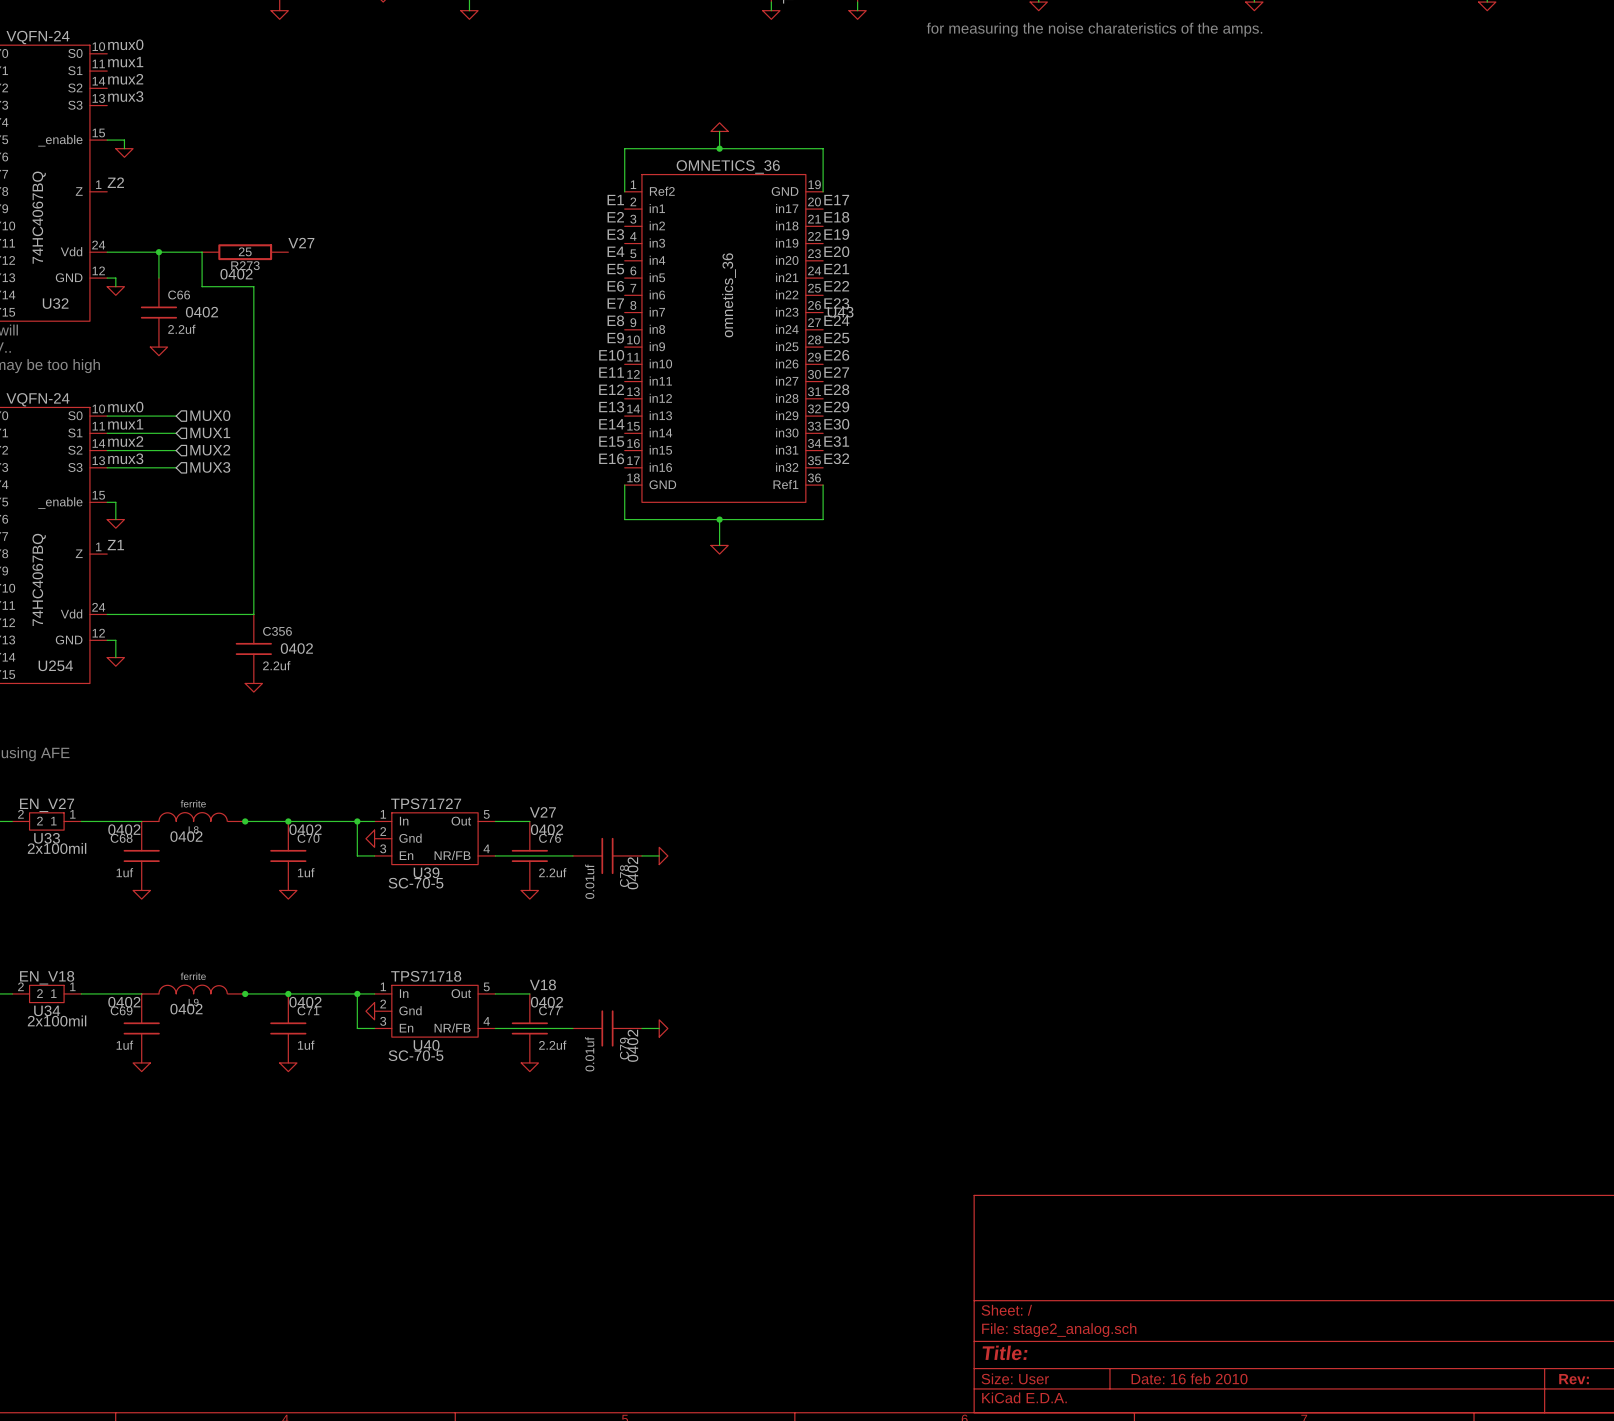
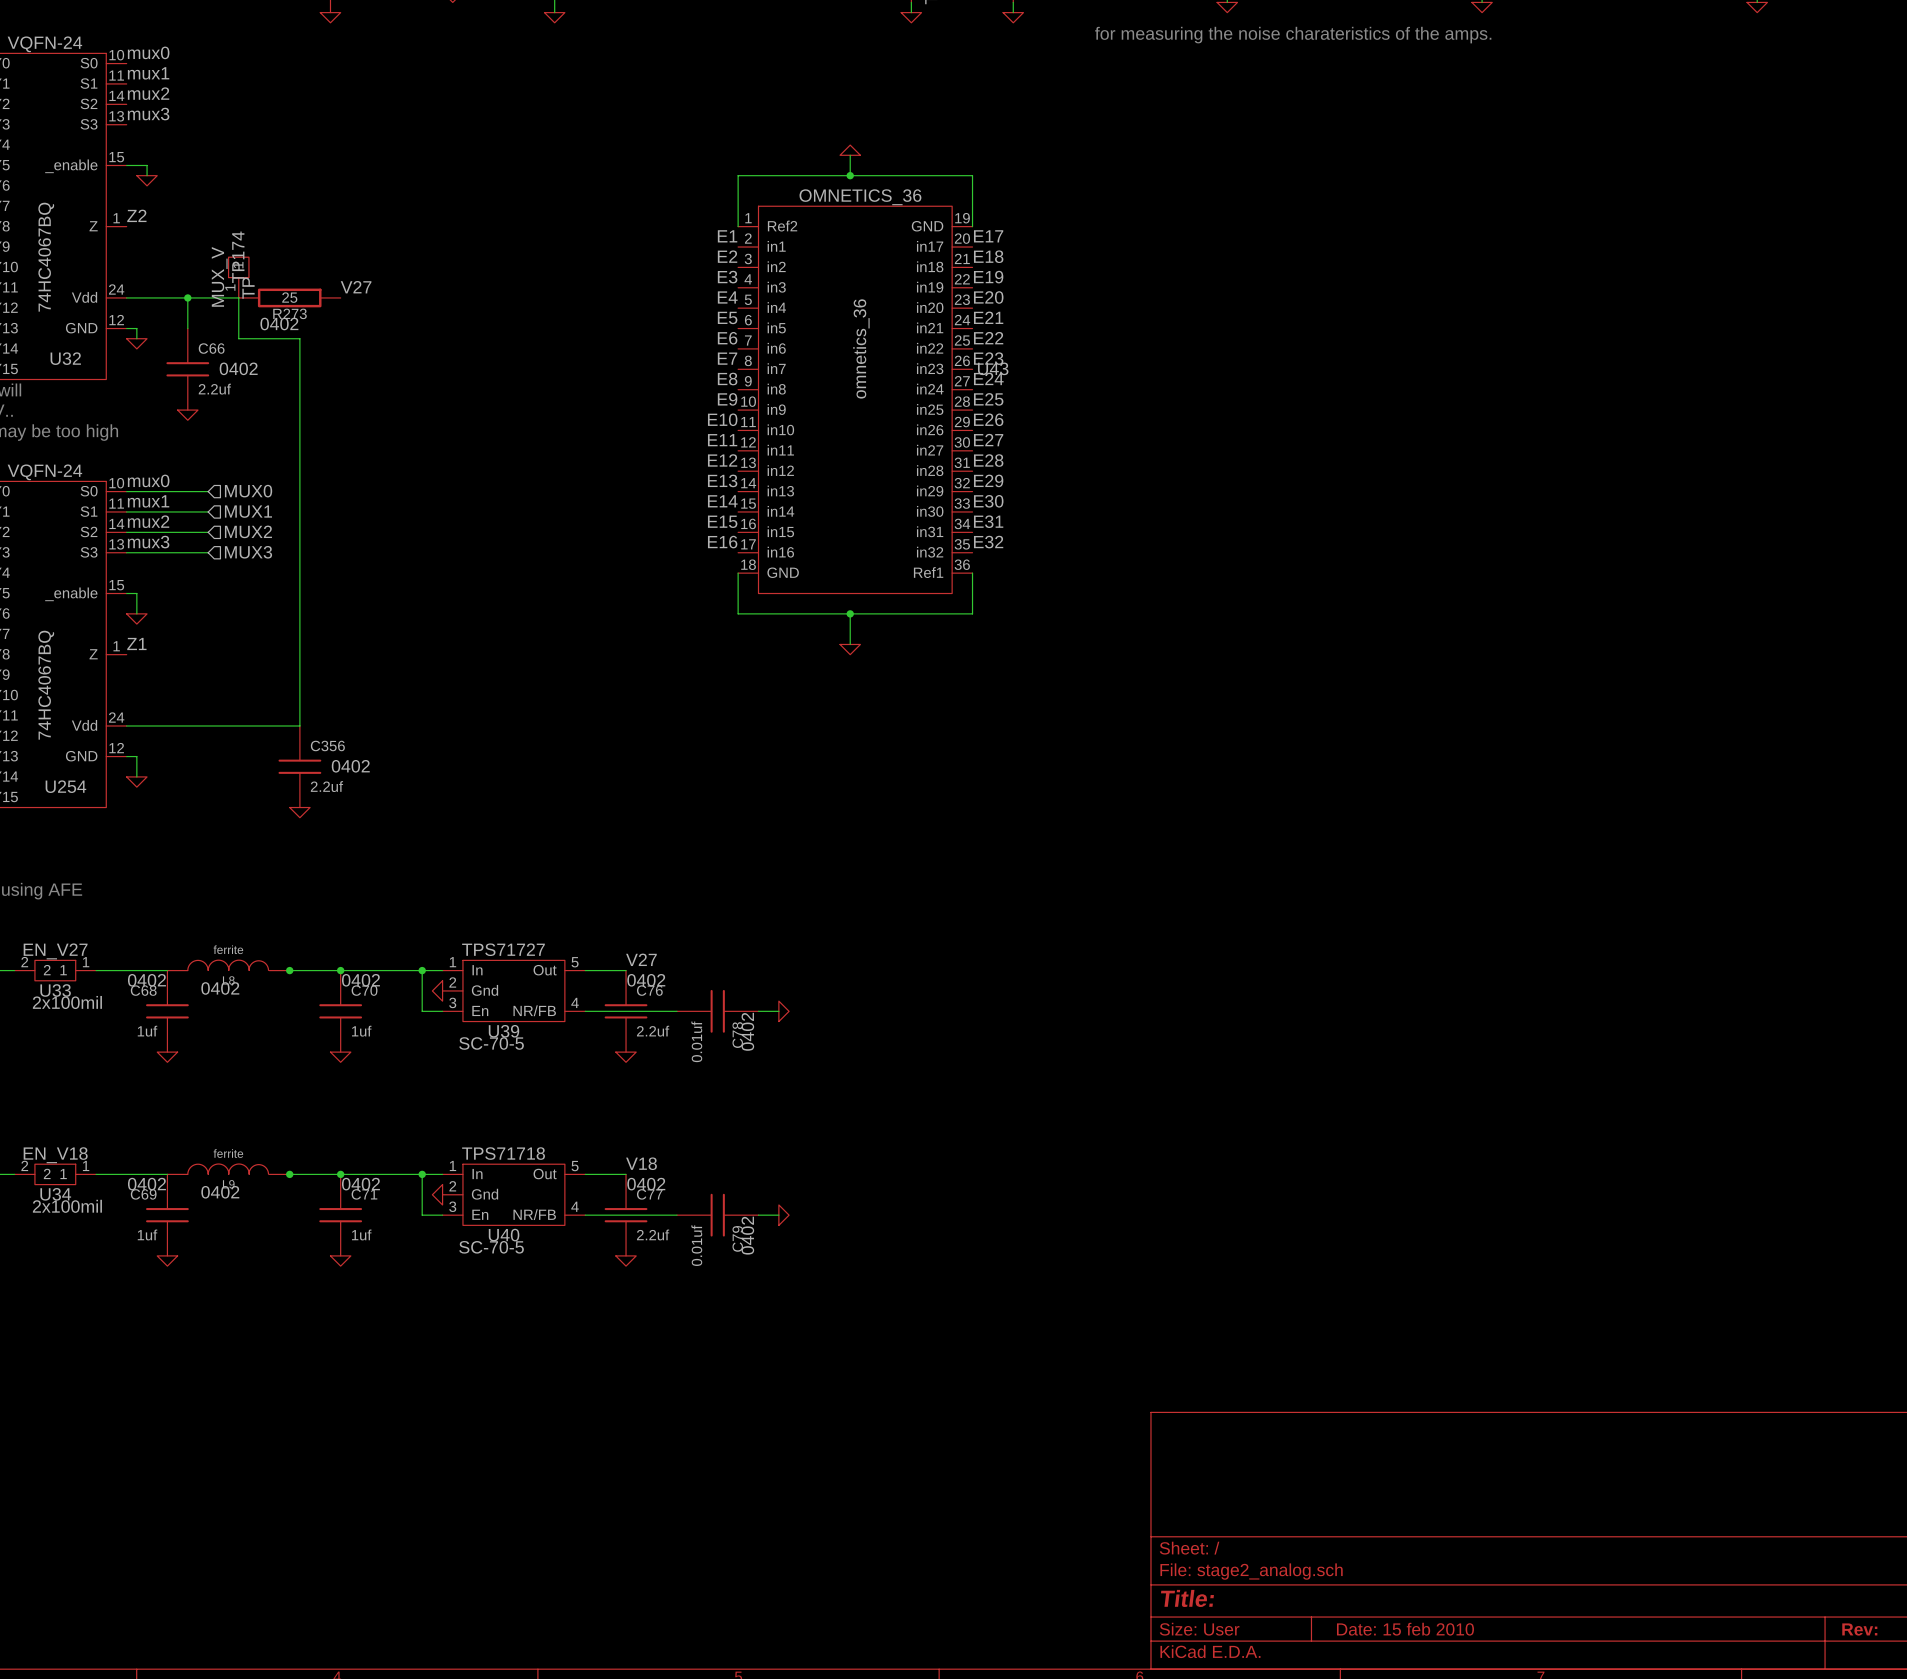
TP174: none -> MUX_V (238, 277)
title block: Date: 16 feb 2010 (1189, 1378) -> Date: 15 feb 2010 (1405, 1629)

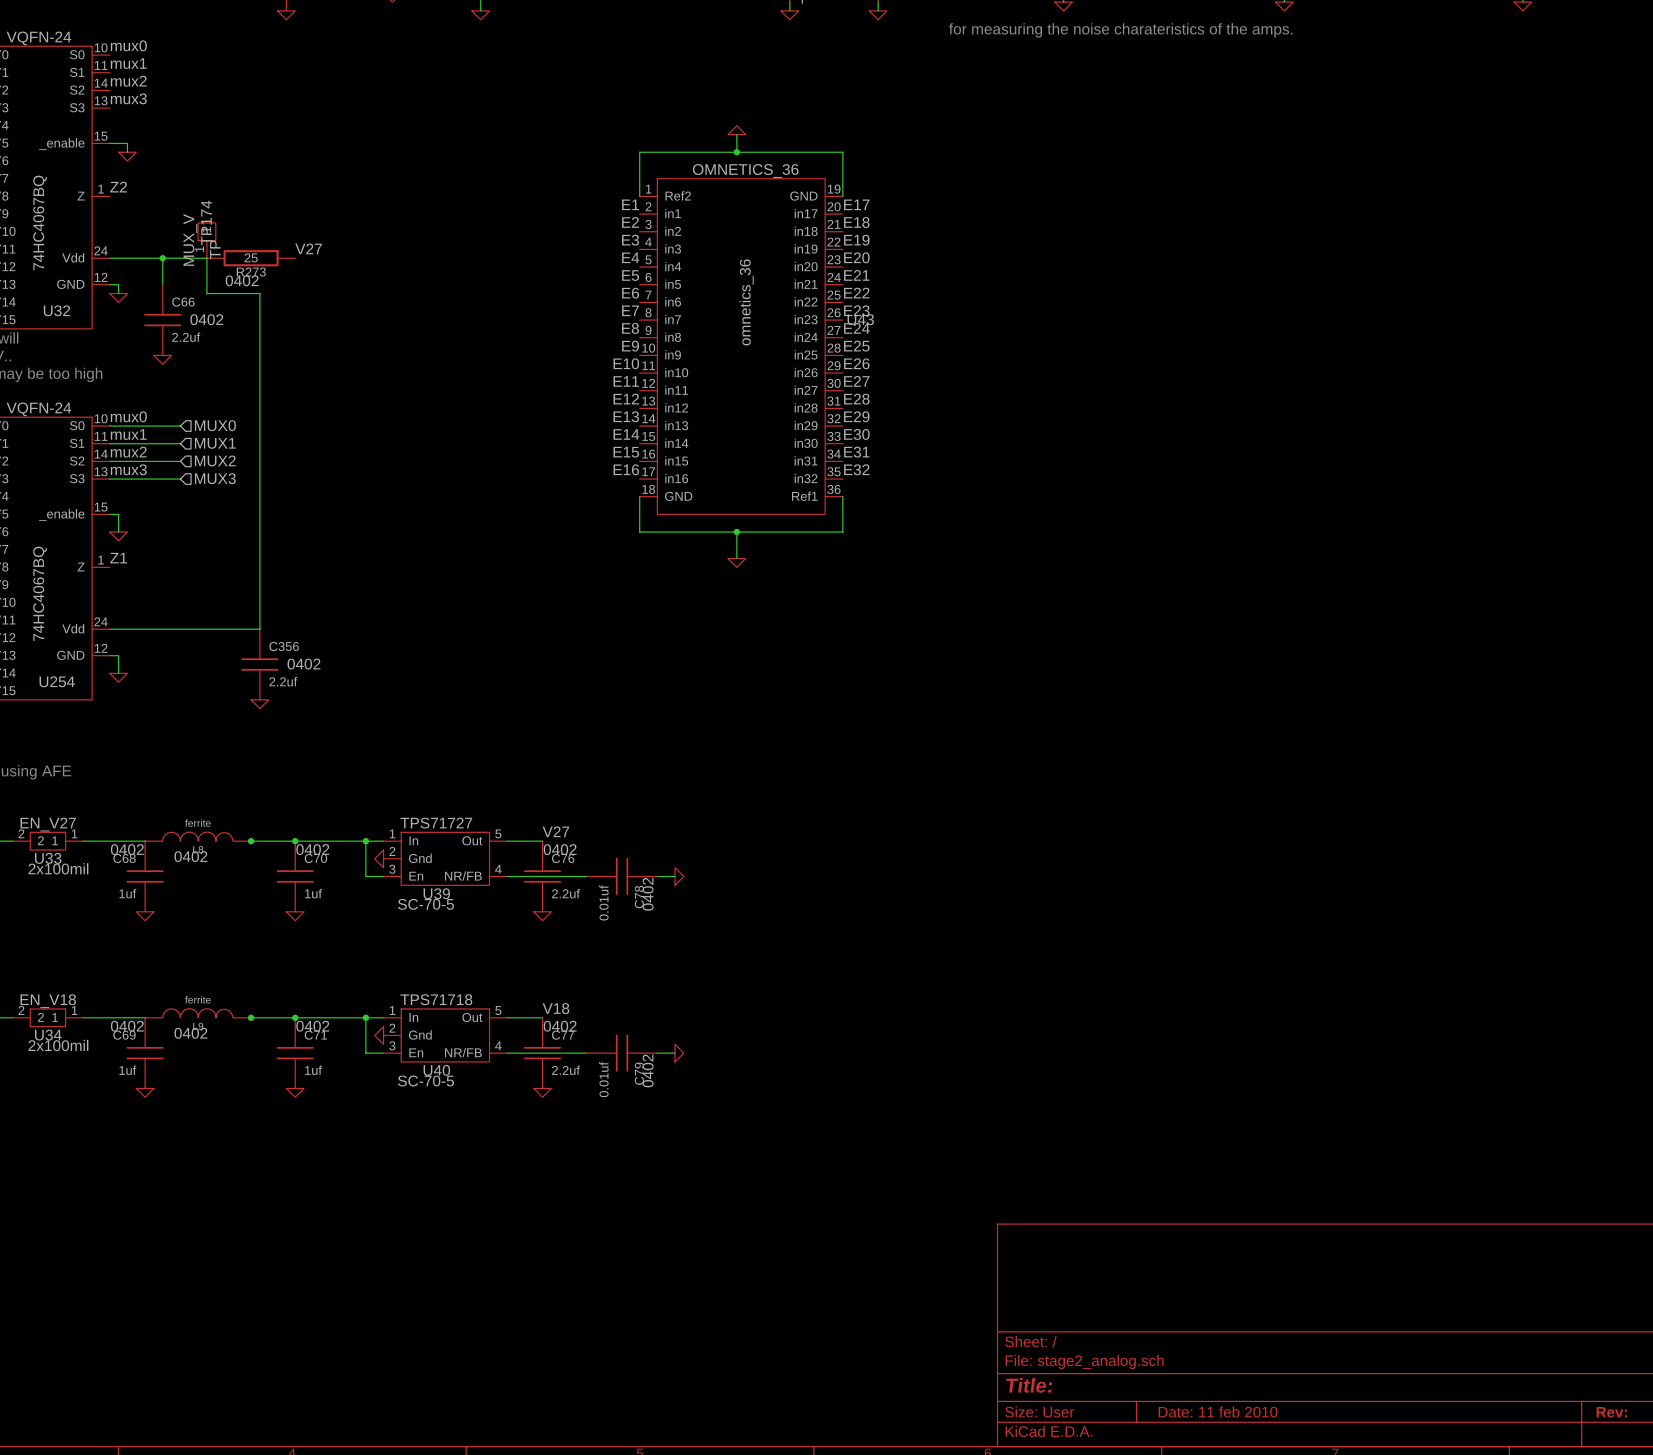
title block: Date: 15 feb 2010 (1405, 1629) -> Date: 11 feb 2010 (1218, 1411)

